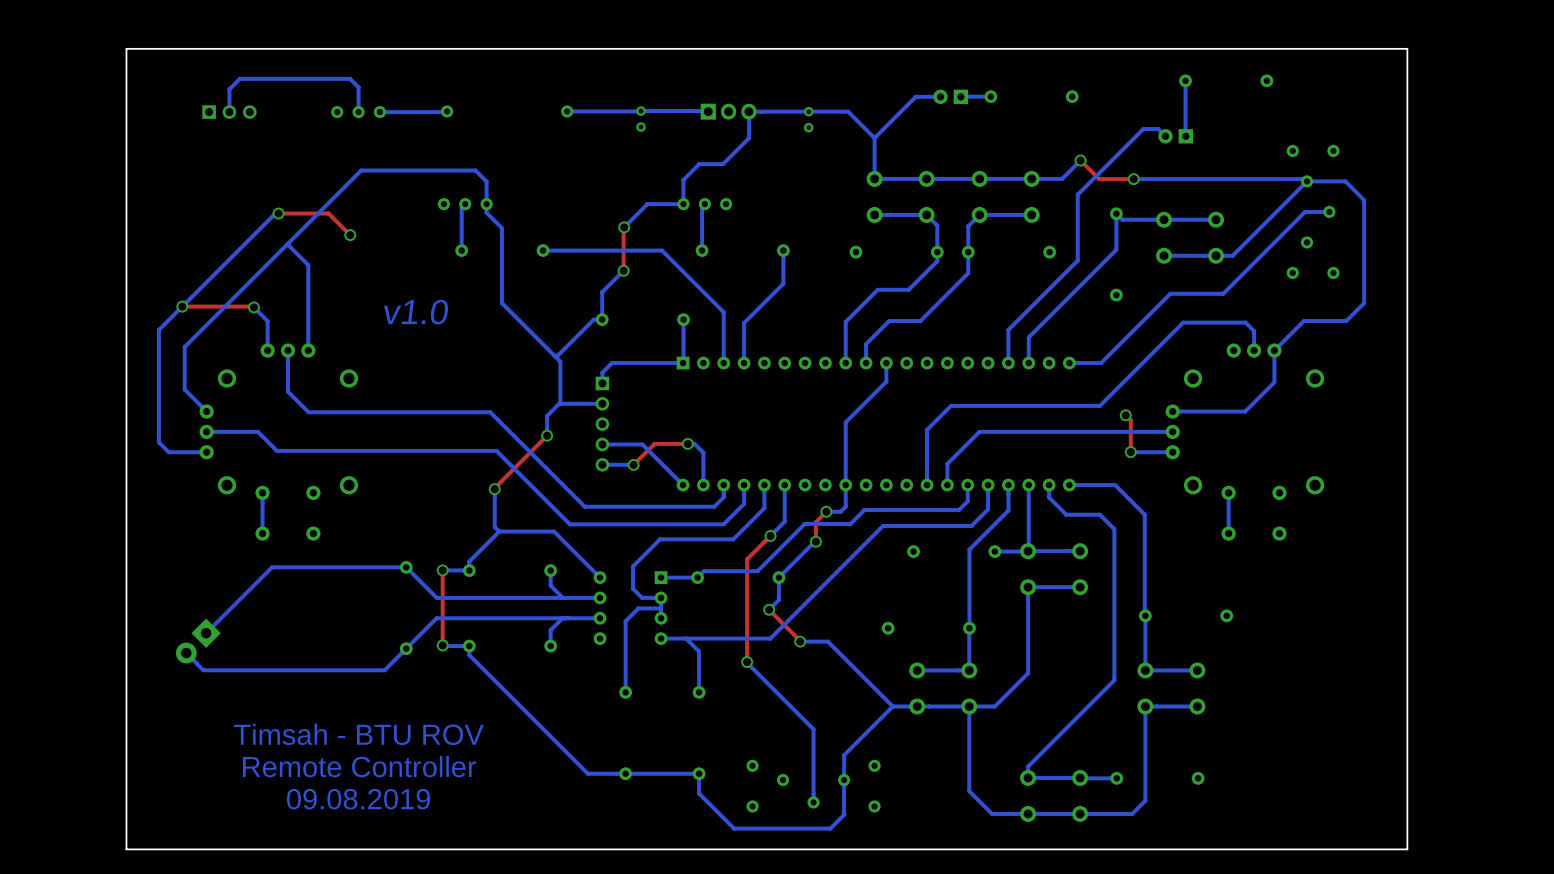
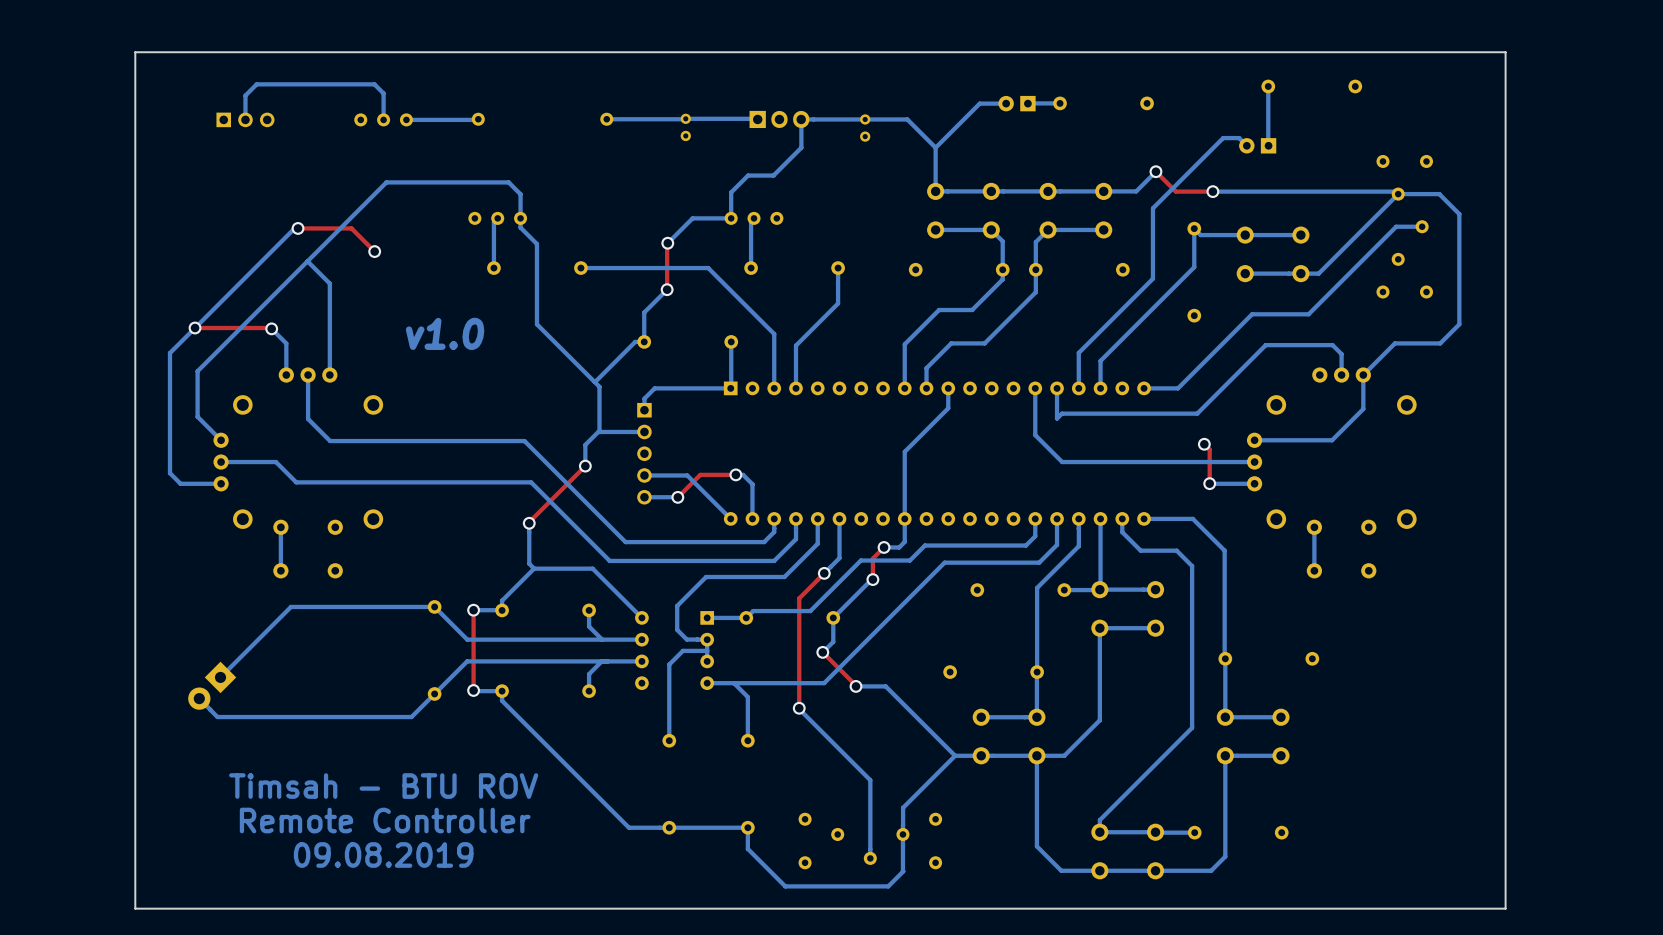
bottom track: (1119, 386) (1099, 405) (951, 405) (927, 429) (927, 485) -> (1197, 413) (1061, 413) (1057, 418) (1057, 388)
bottom track: (992, 431) (979, 431) (947, 463) (947, 485) -> (1062, 462) (1035, 435) (1035, 388)

